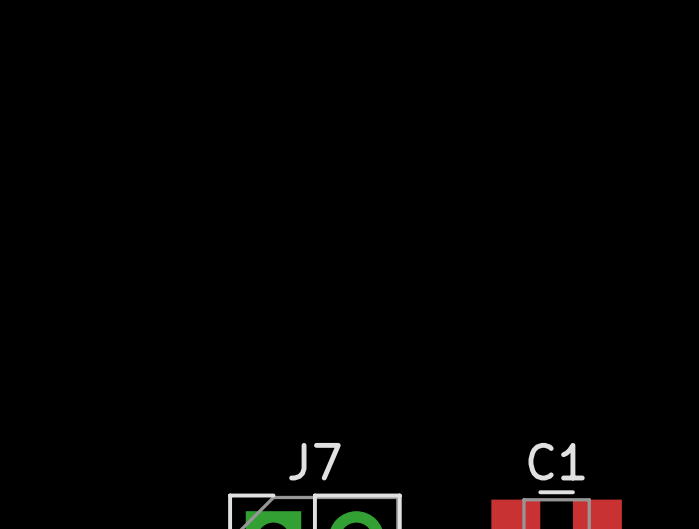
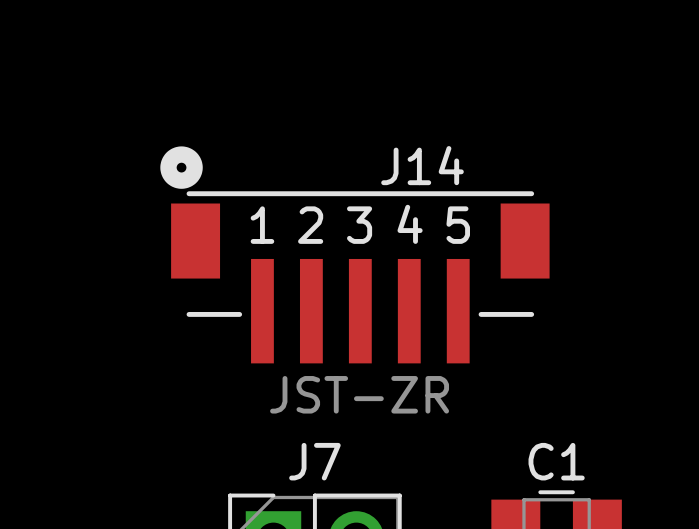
J14: none -> JST-ZR (354, 254)

